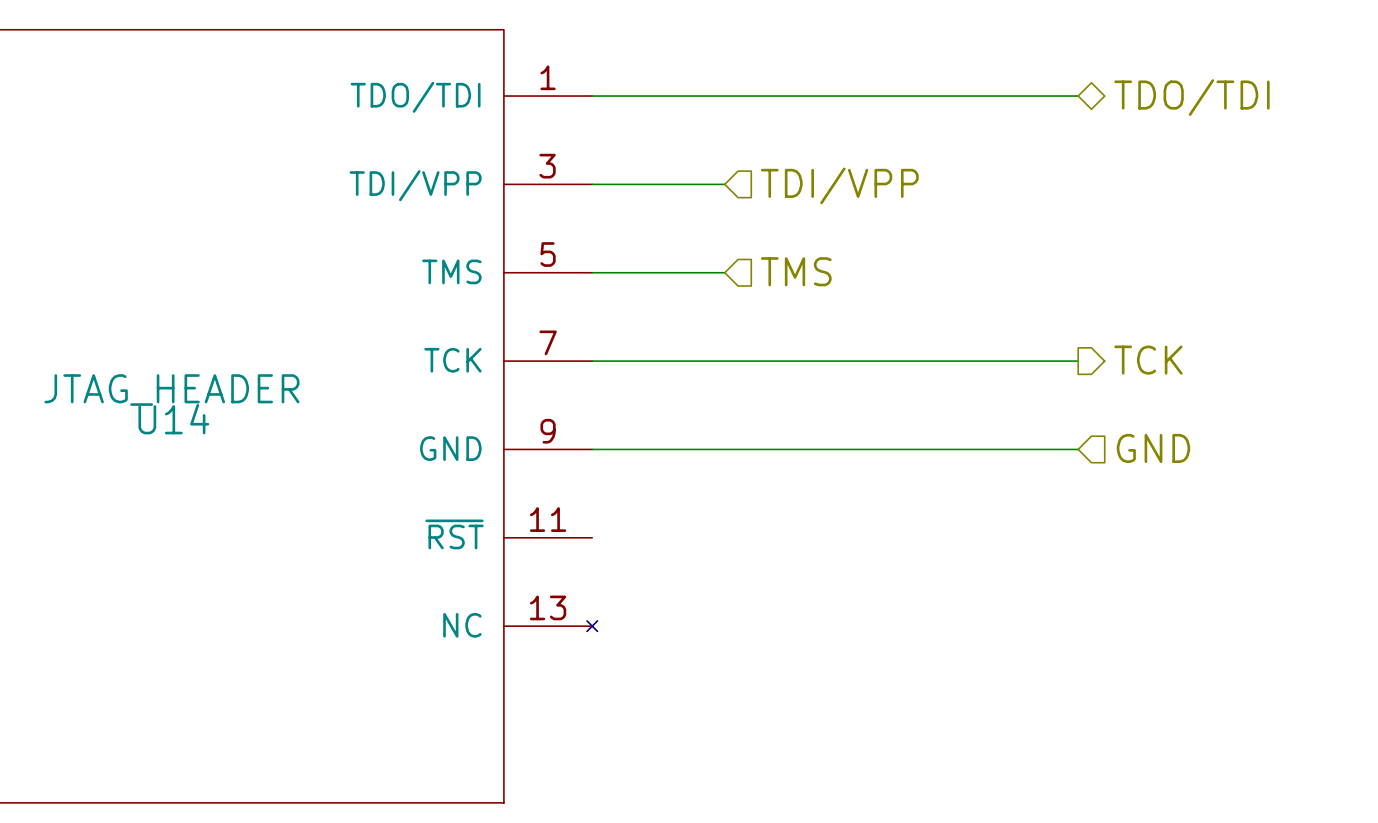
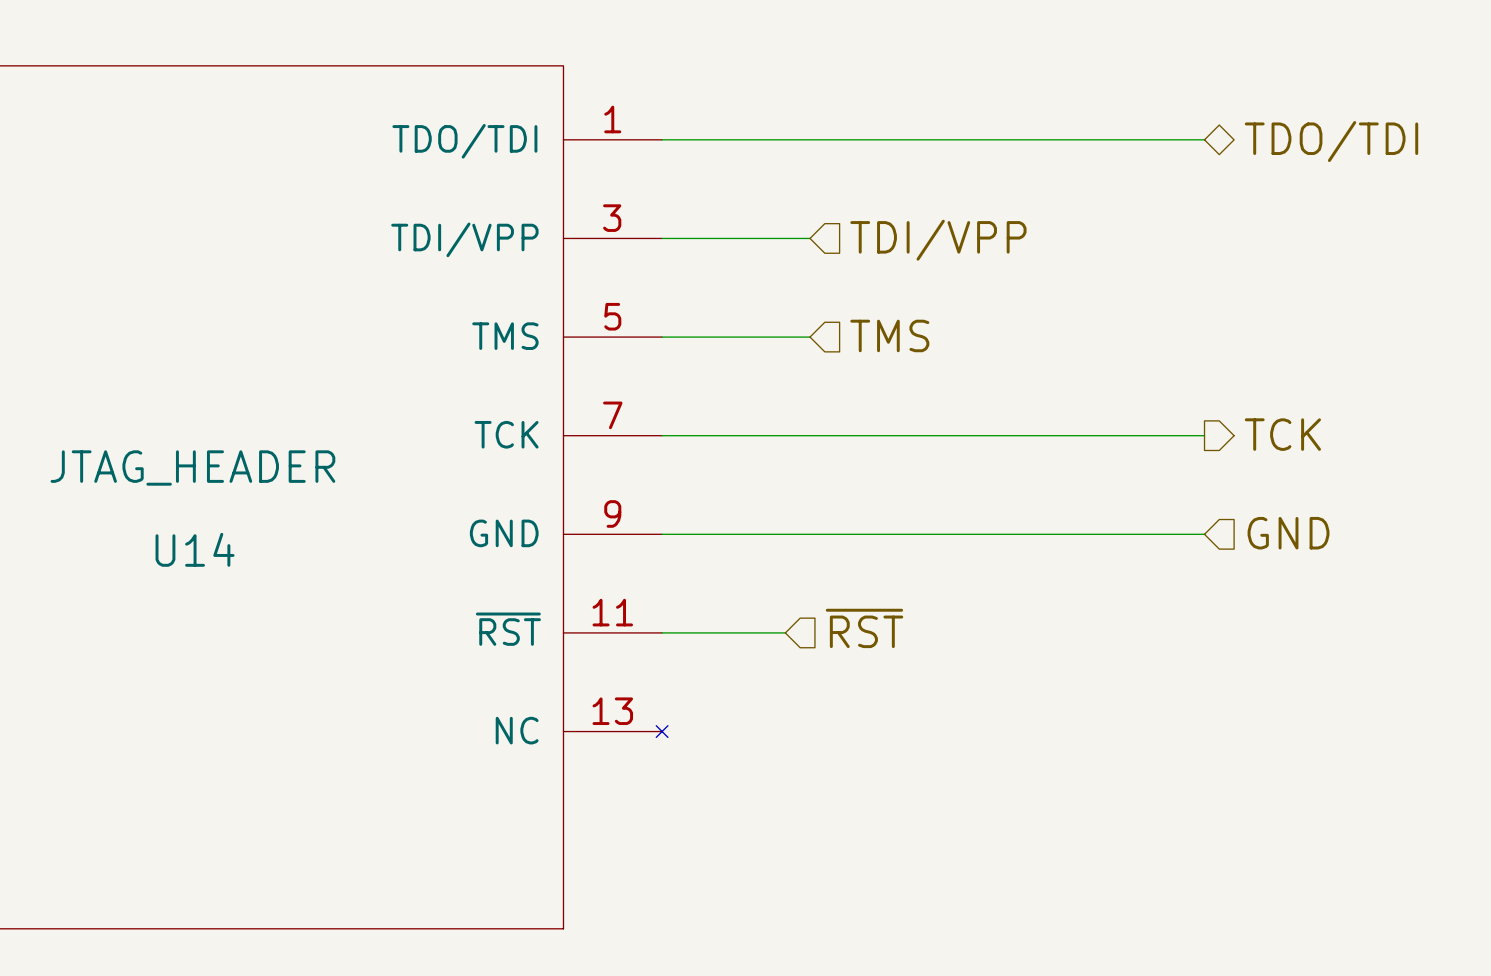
U14 name position: U14 (173, 419) -> U14 (195, 549)
hierarchical label: none -> ~{RST} (864, 628)
wire: none -> (662, 632) (785, 632)

